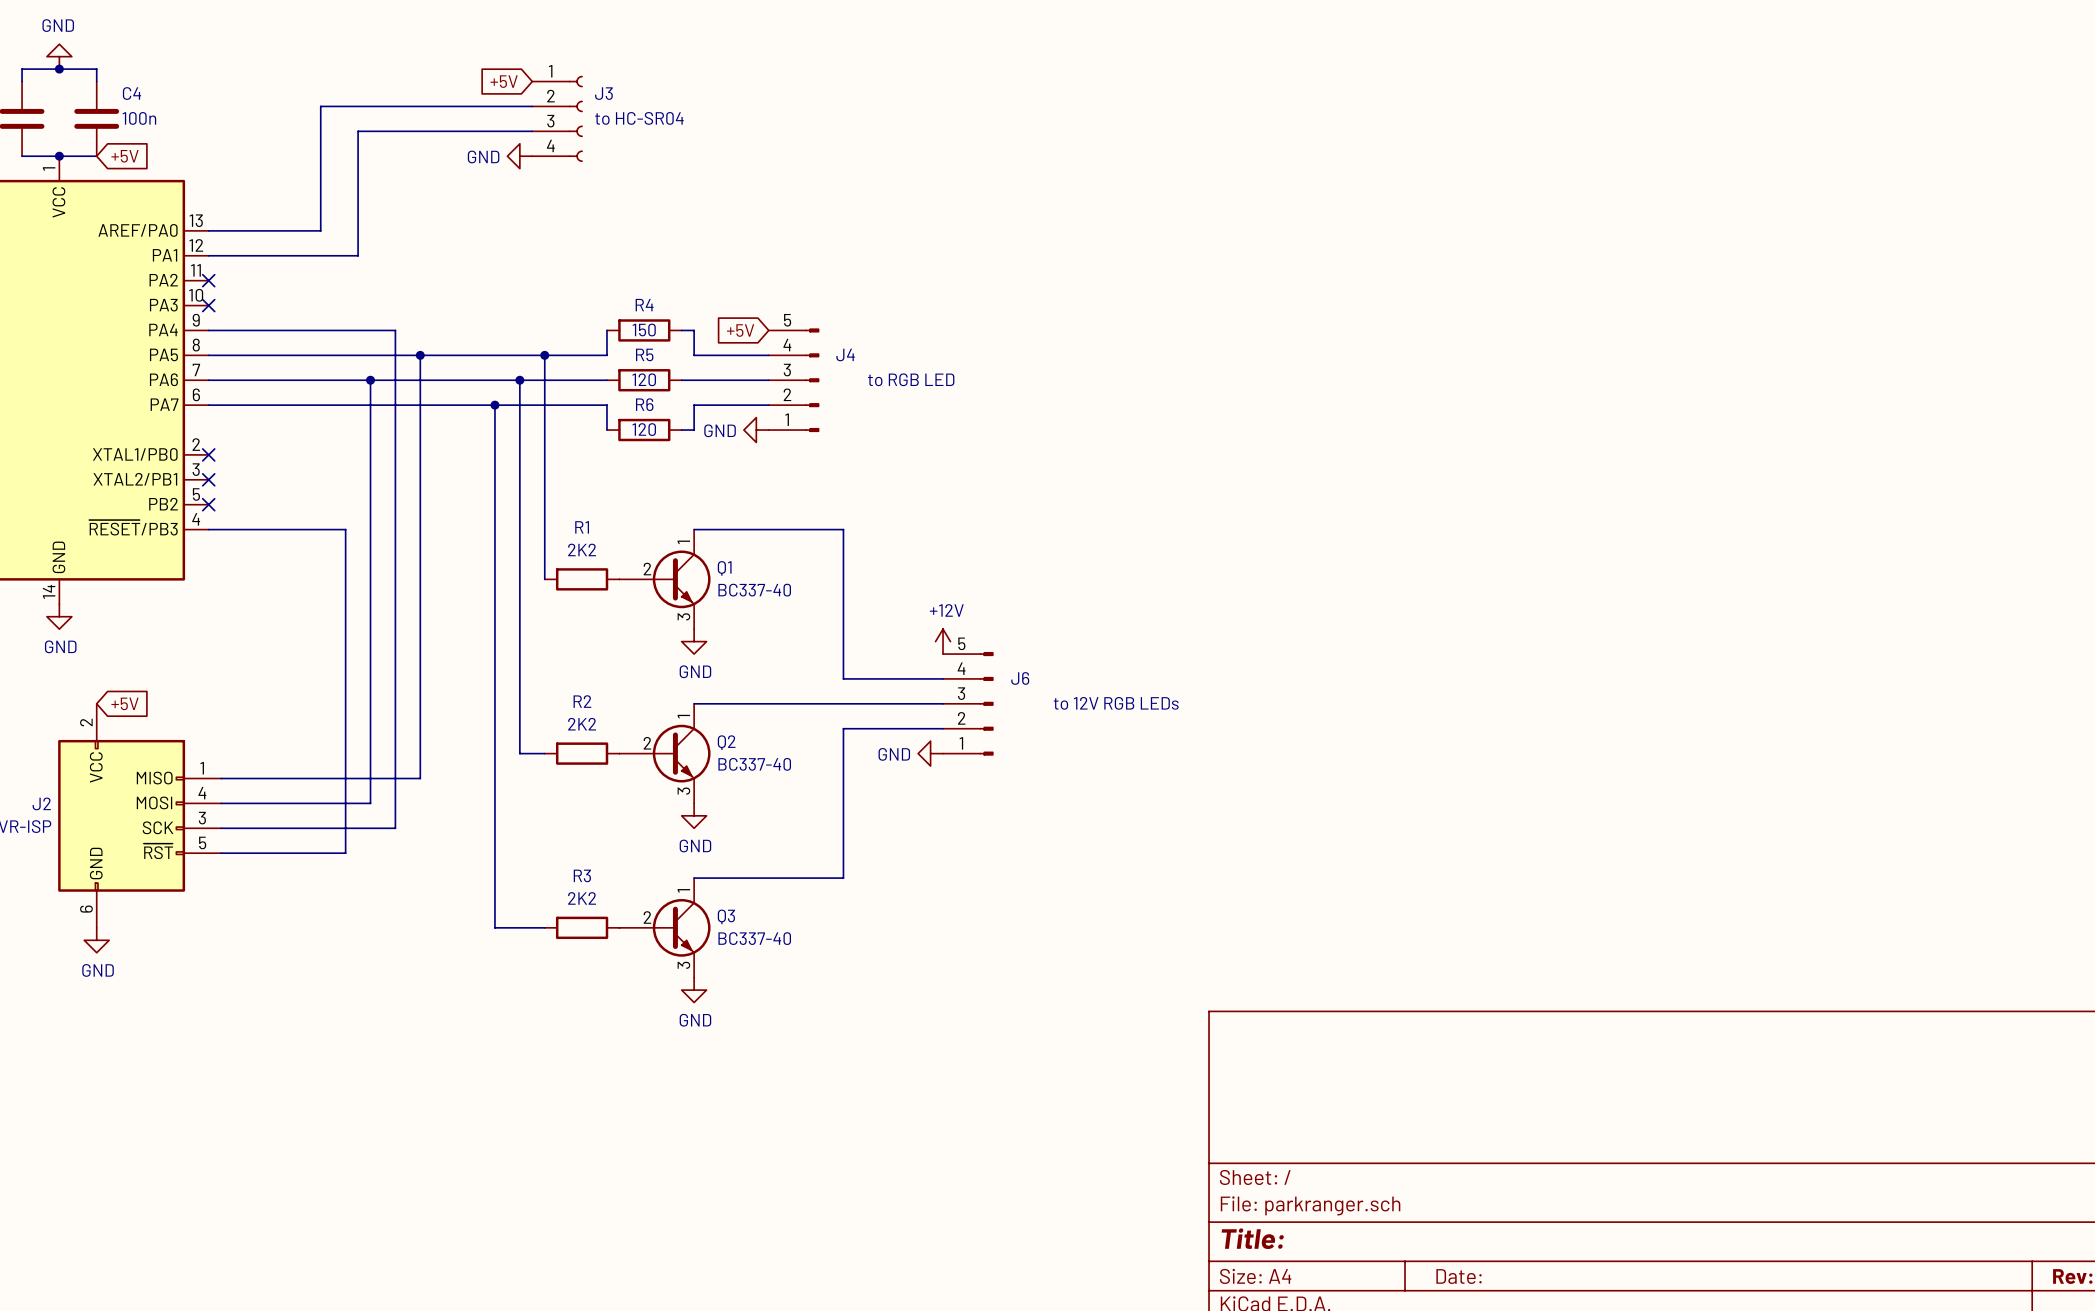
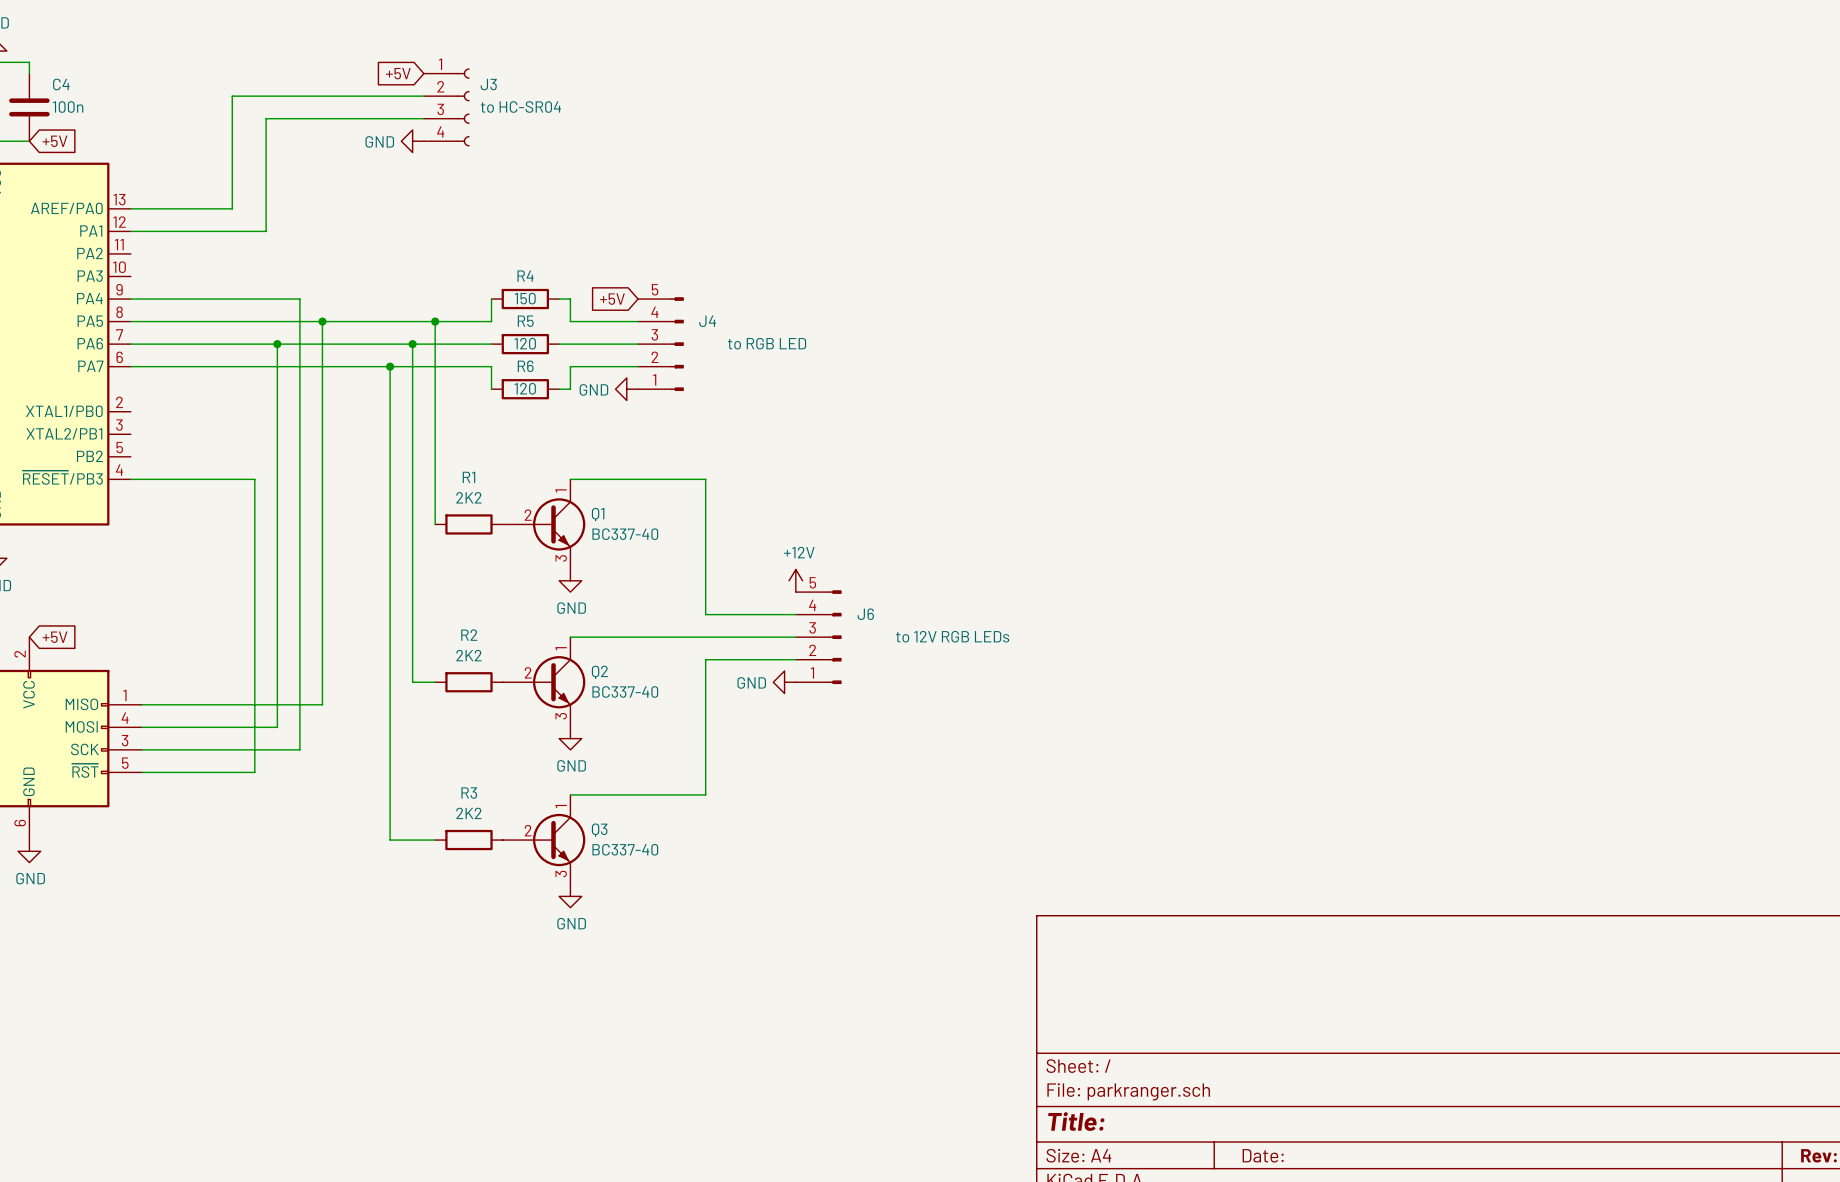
no-connect mark: (208, 280) -> none
no-connect mark: (208, 305) -> none
no-connect mark: (208, 454) -> none
no-connect mark: (208, 479) -> none
no-connect mark: (208, 504) -> none

